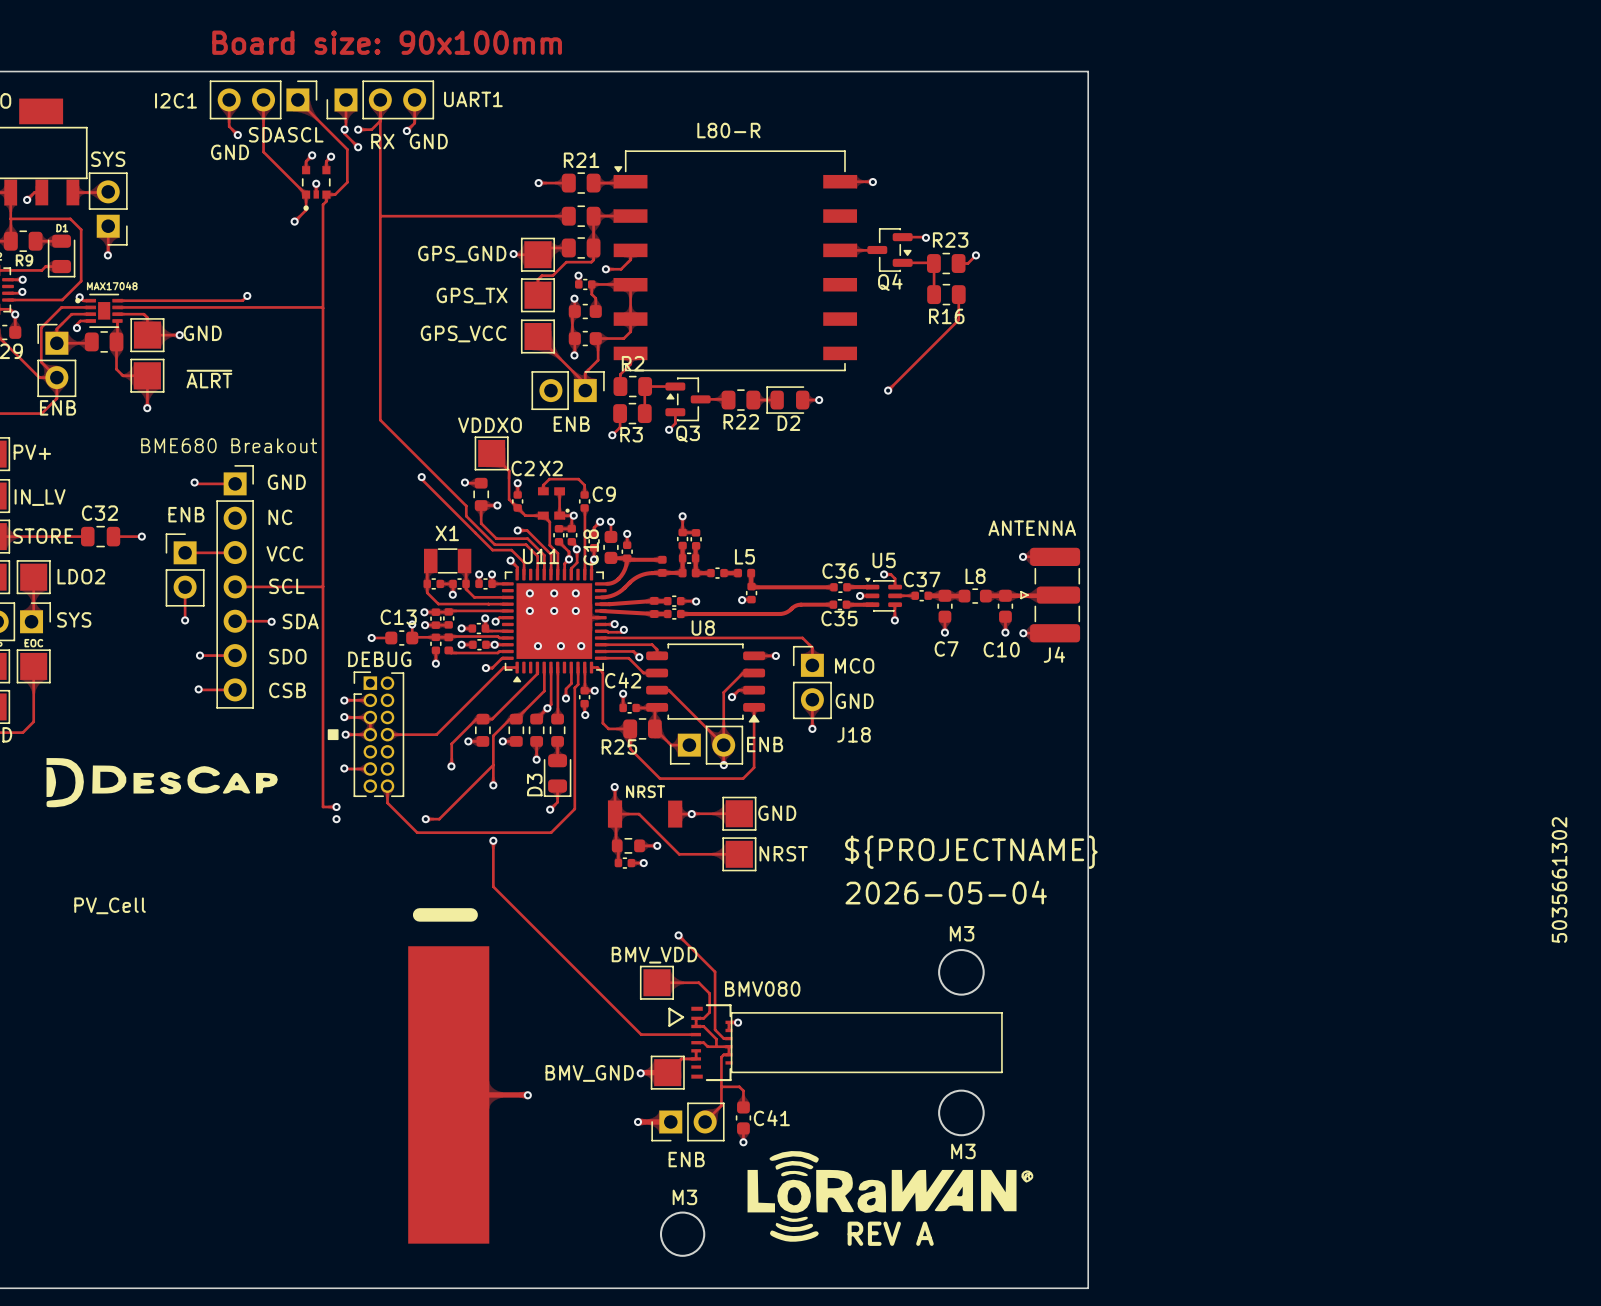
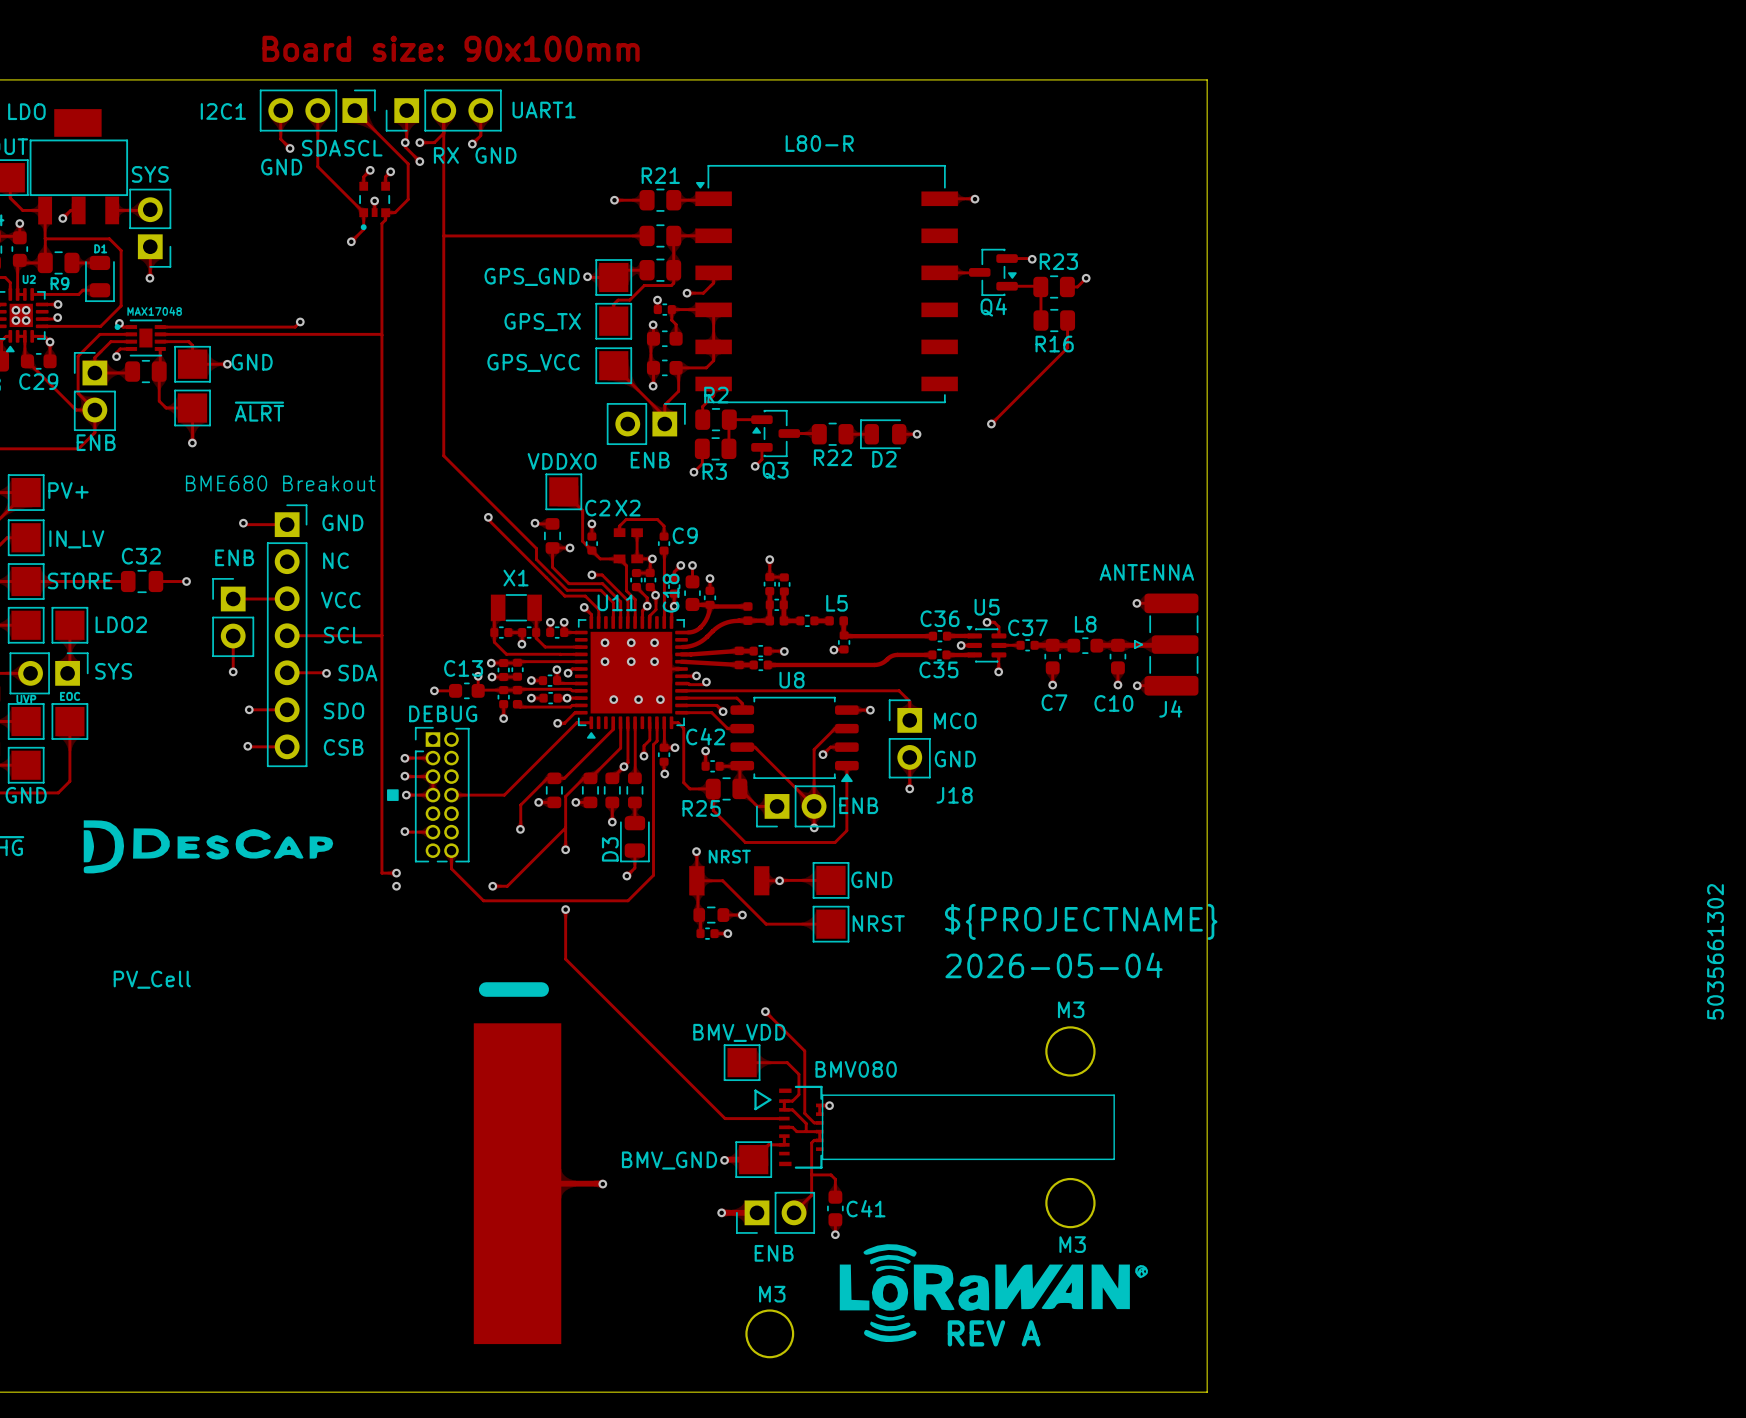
drawing: [565, 508, 570, 513] -> none

